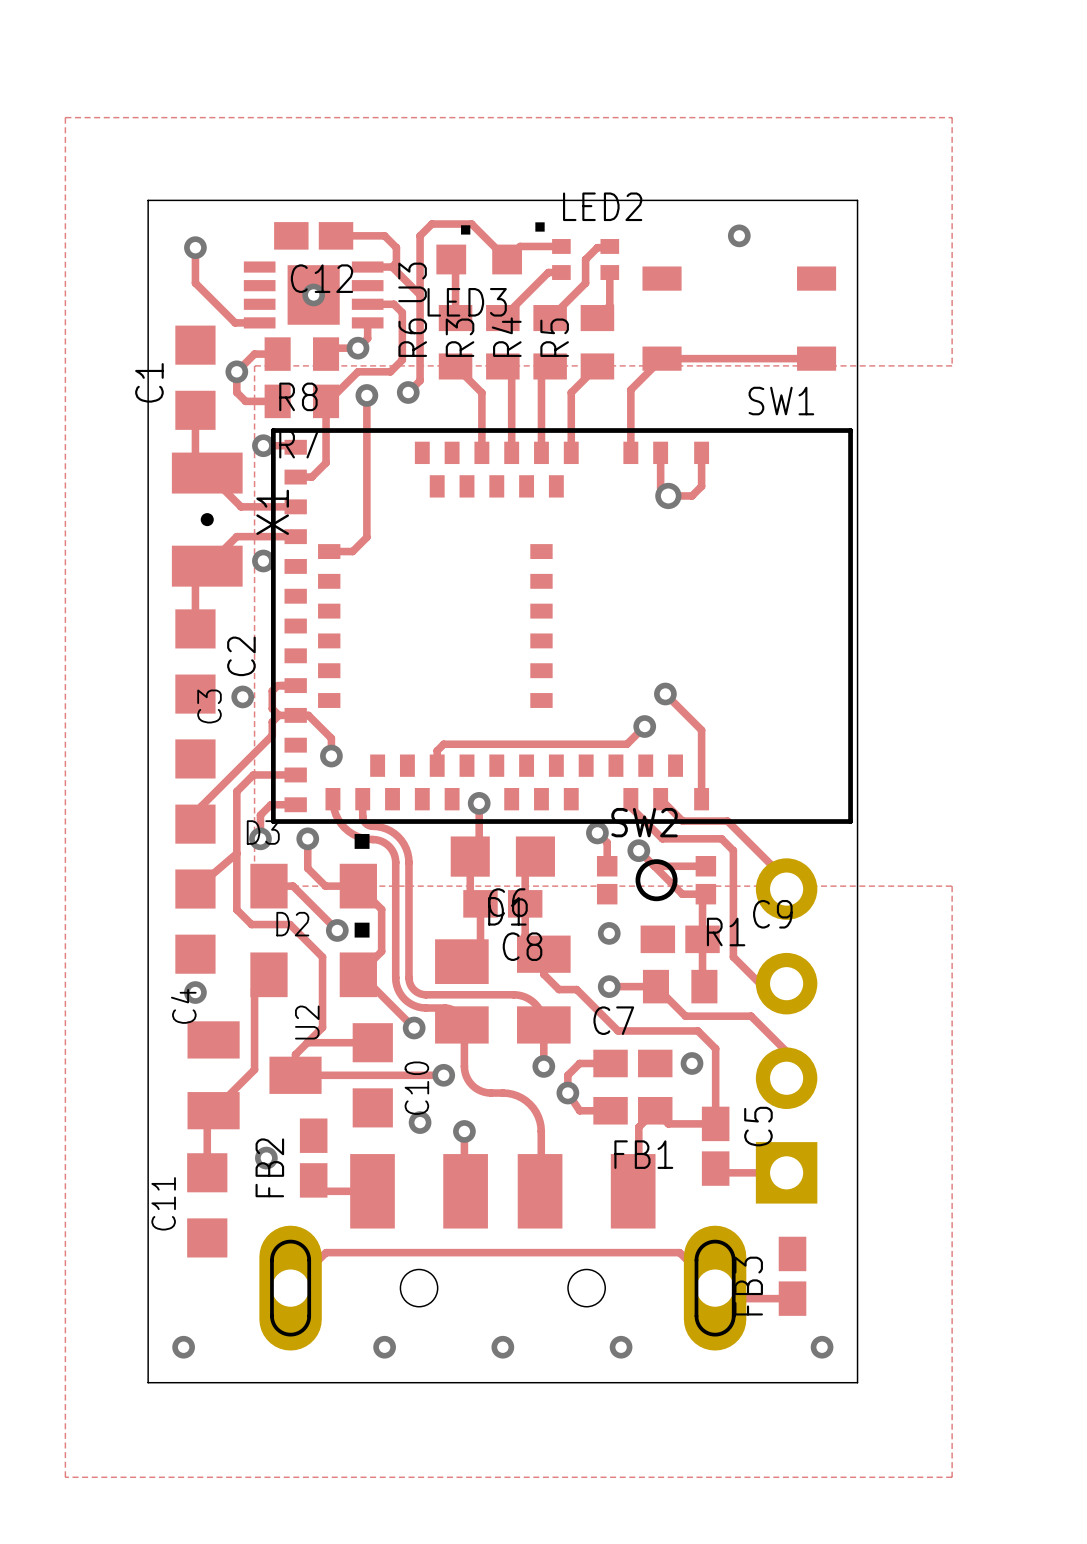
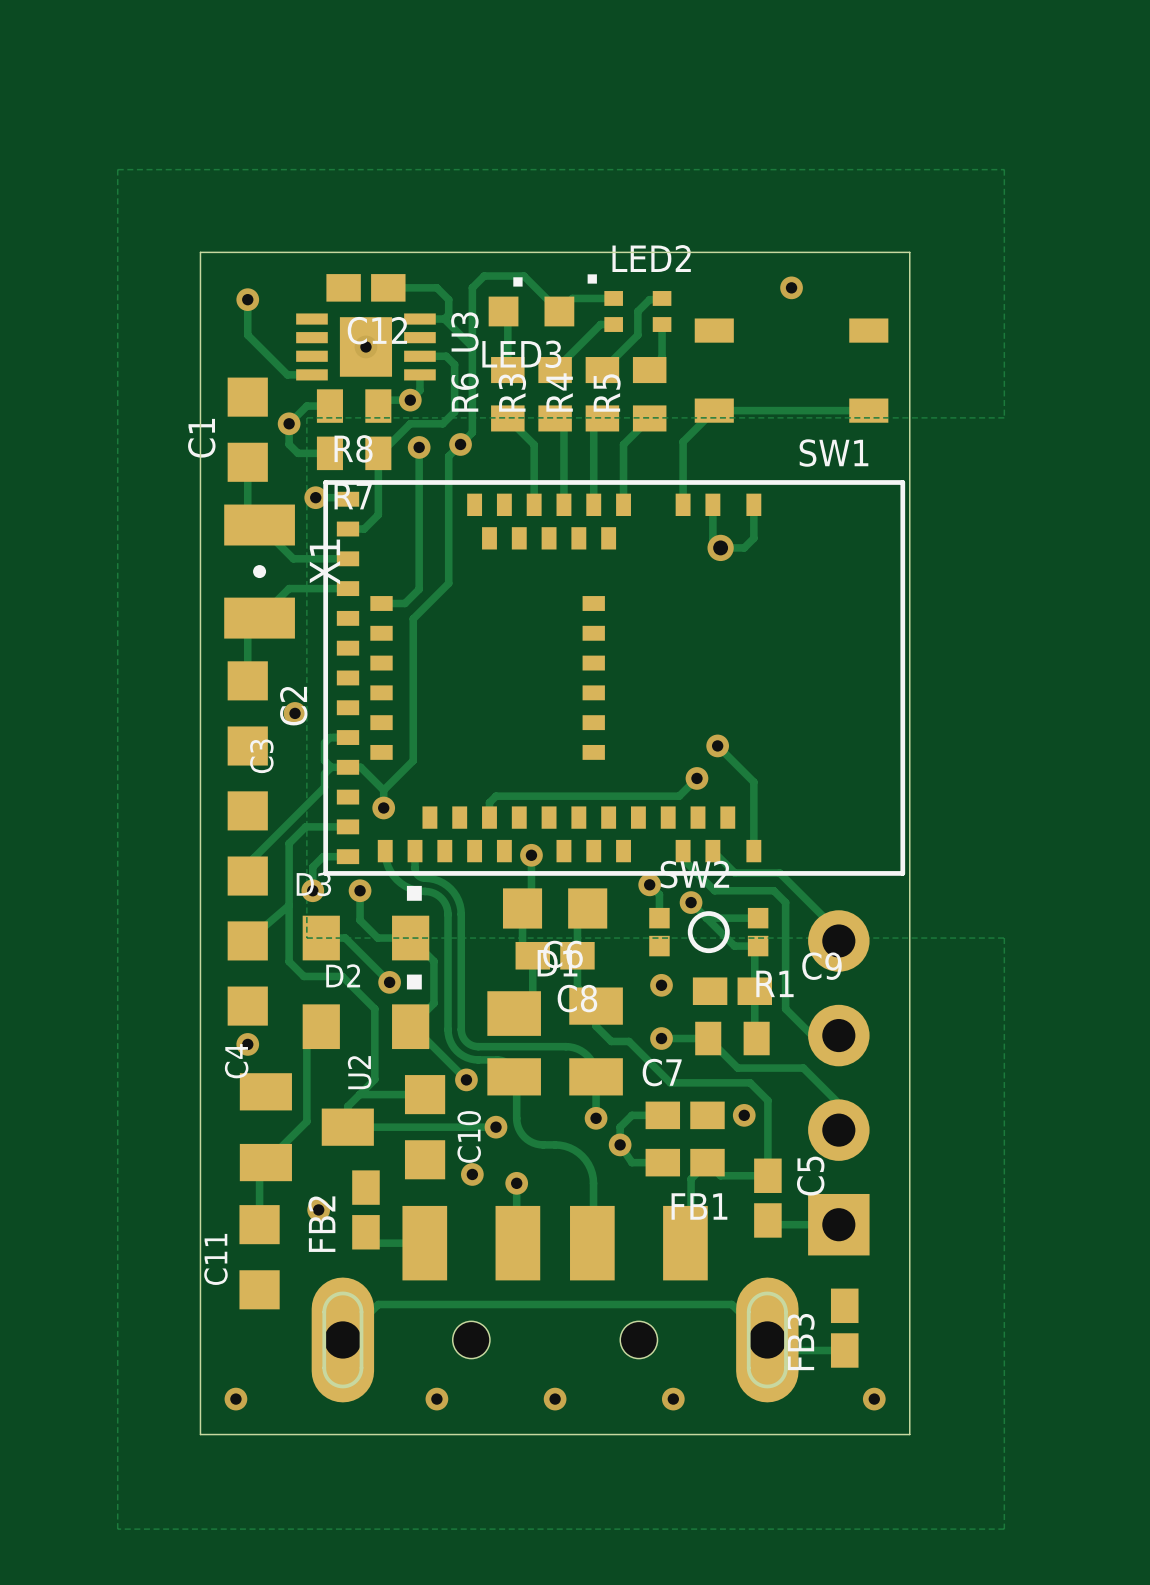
track: none -> (460, 444) (448, 456) (448, 583) (413, 618) (413, 760) (383, 790)
via: (263, 560) -> none
via position: (242, 696) -> (295, 713)

